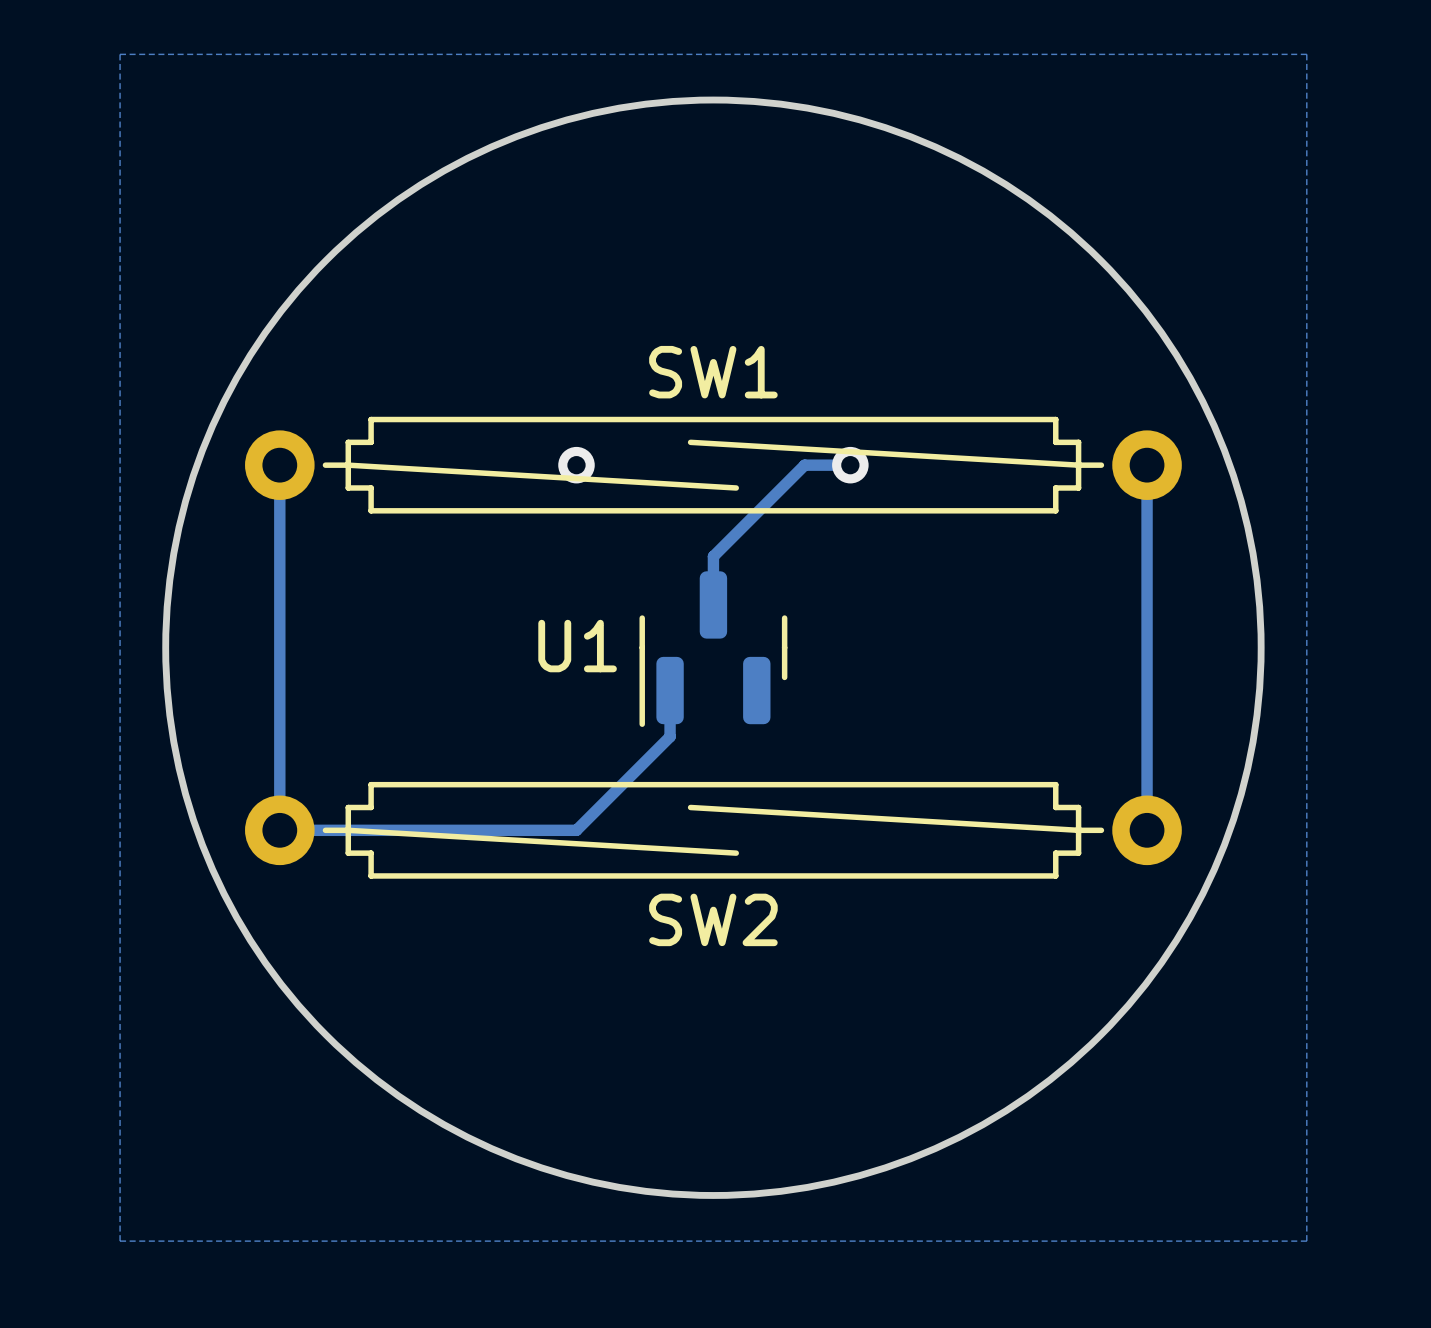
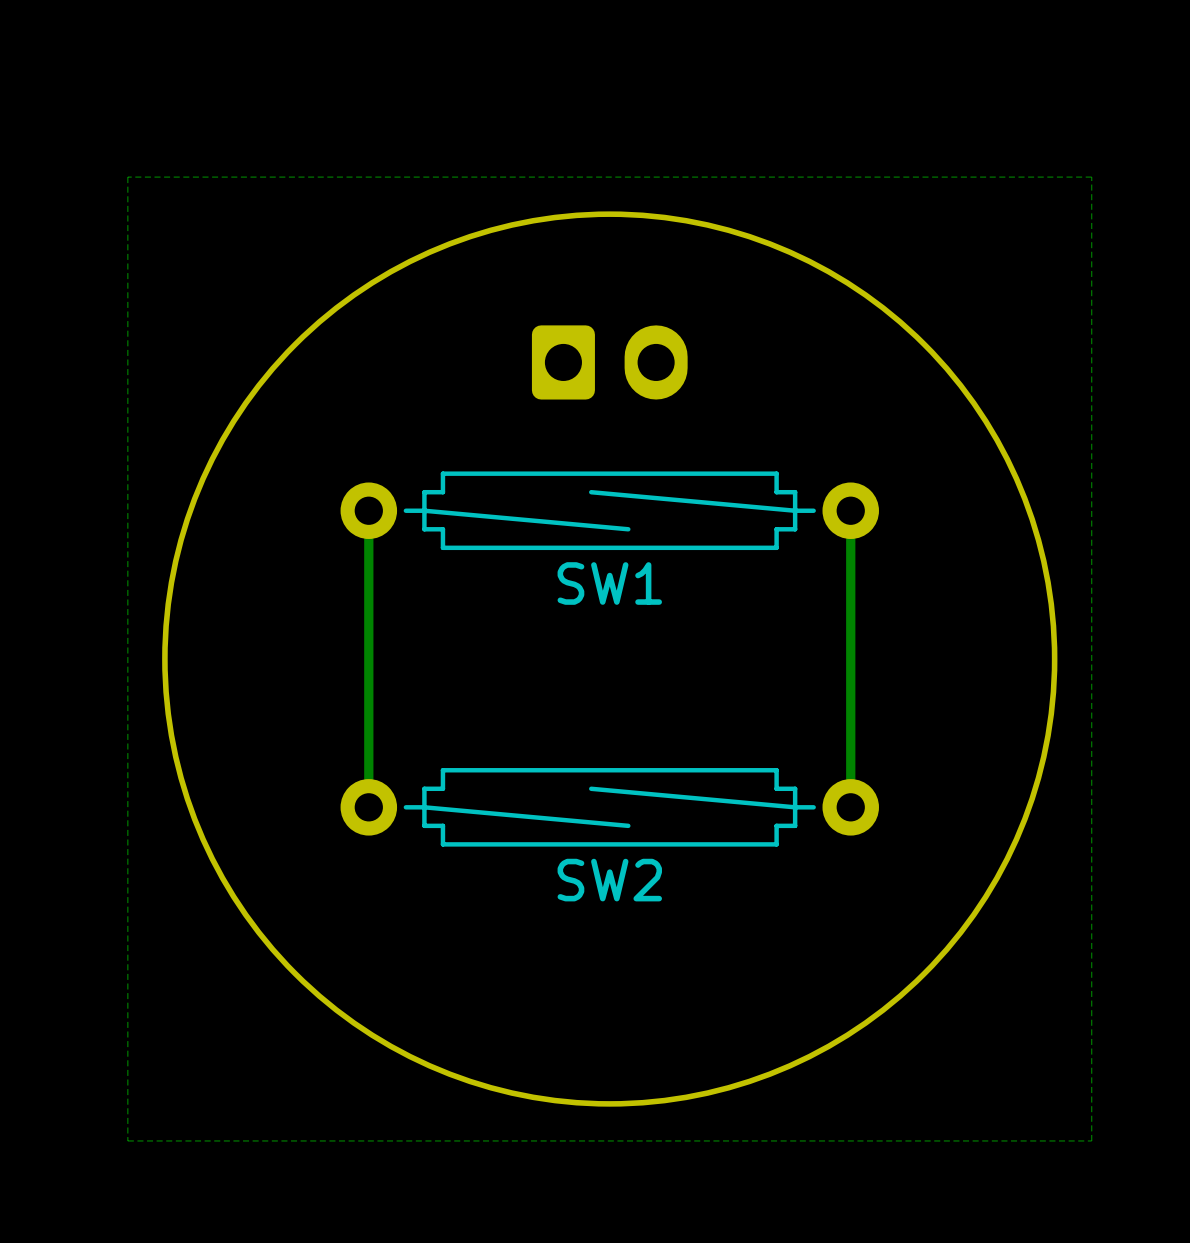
part: none -> (609, 362)
SW1 name position: SW1 (713, 372) -> SW1 (609, 583)
SW1 footprint: [245, 416, 1182, 514] -> [340, 471, 879, 551]
track: (279, 465) (279, 830) (576, 830) (670, 736) (670, 690) -> none
track: none -> (368, 510) (368, 807)
via: (576, 465) -> none
track: (850, 465) (804, 465) (713, 556) (713, 604) -> none
via: (850, 465) -> none
track: (1147, 465) (1147, 830) -> (850, 510) (850, 807)
U1: (713, 649) -> none
SW2 footprint: [245, 781, 1182, 879] -> [340, 768, 879, 847]

